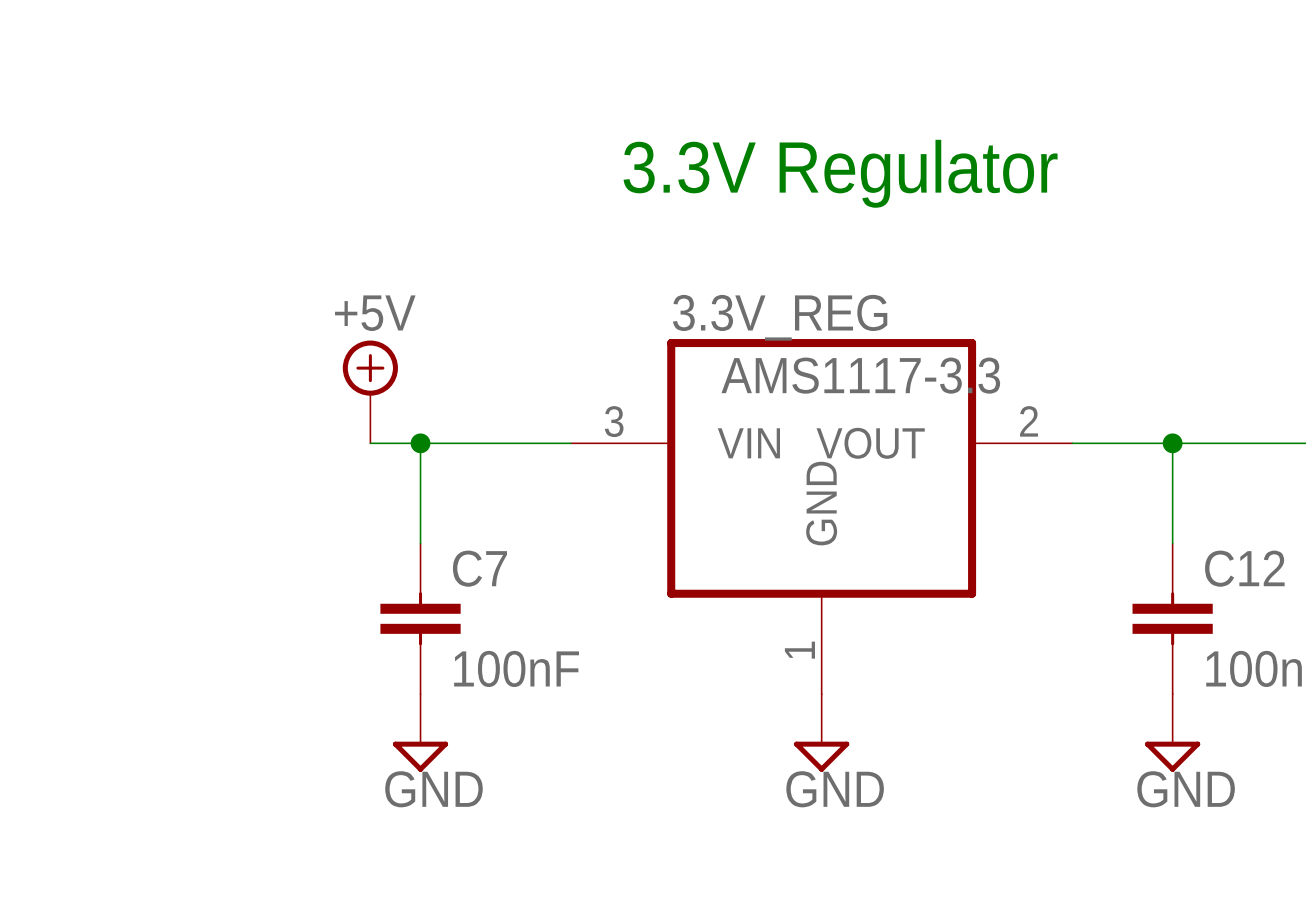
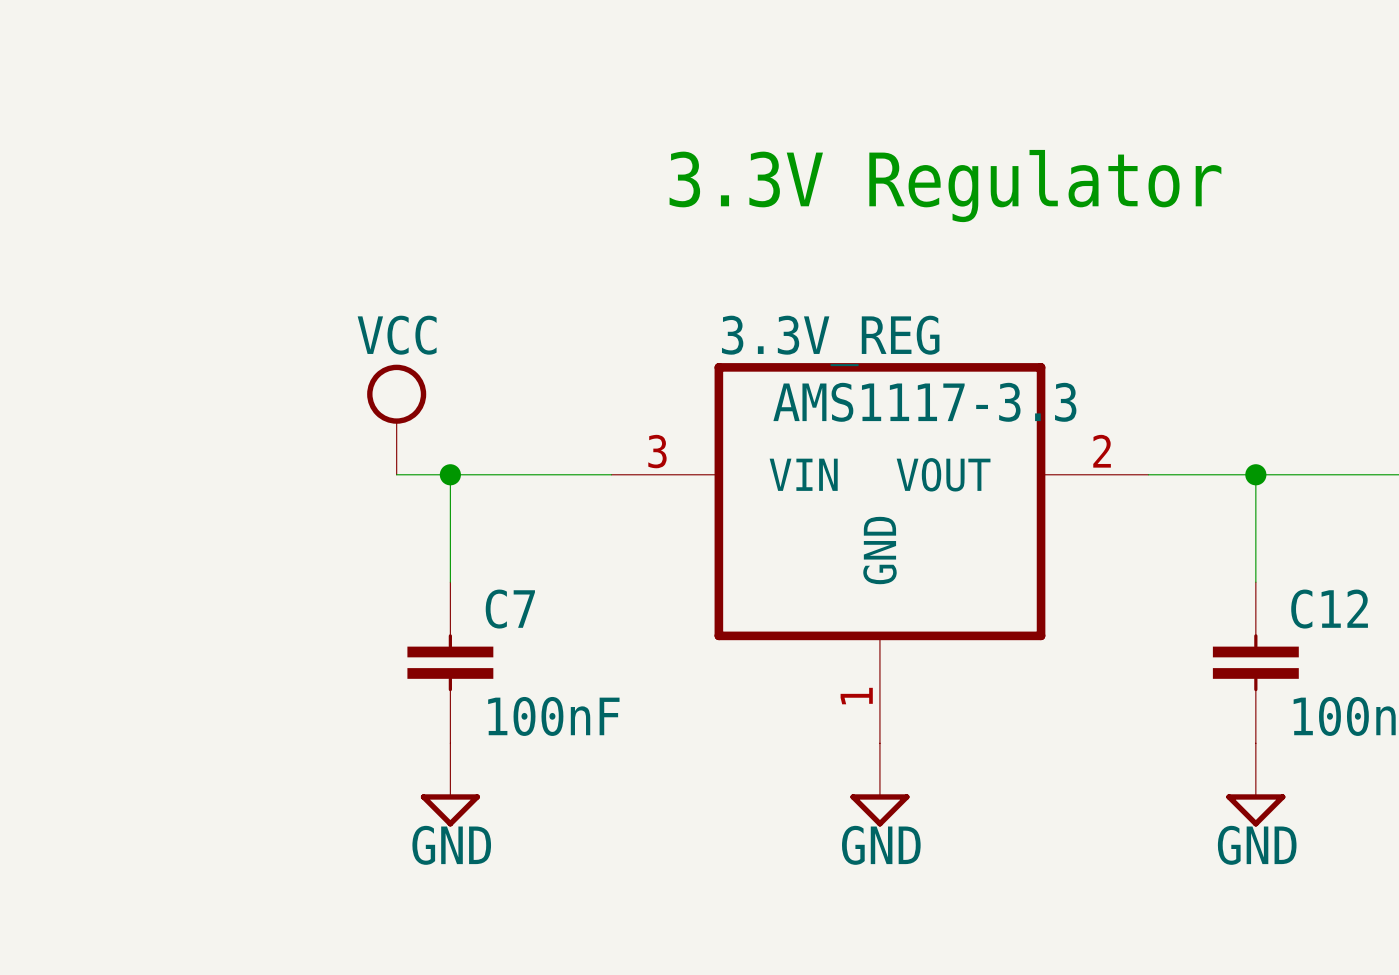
power symbol: +5V (370, 391) -> VCC (396, 419)

